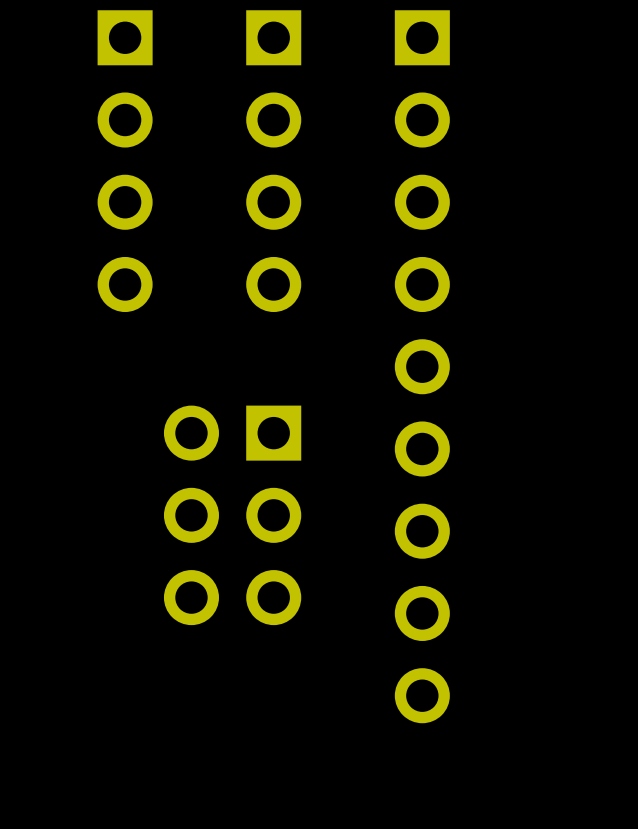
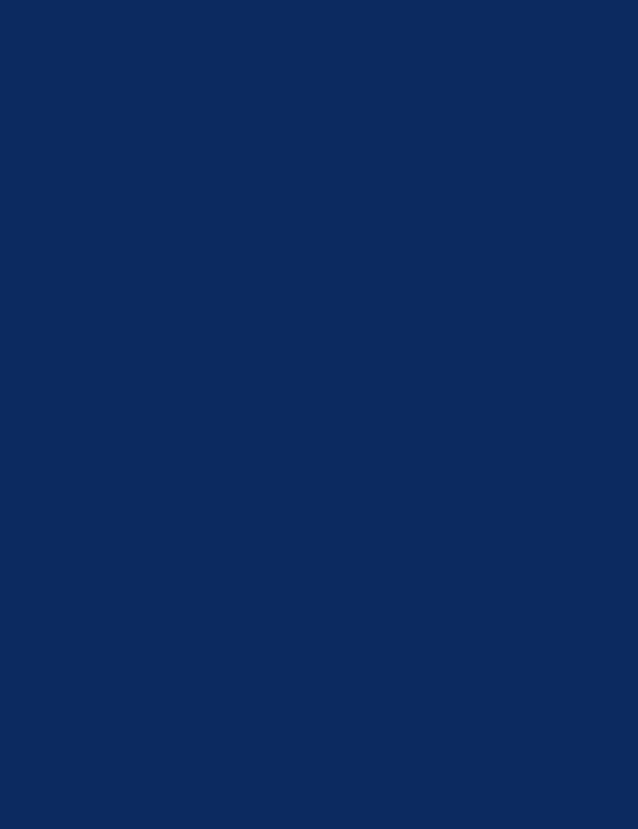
part: (125, 161) -> none
part: (273, 161) -> none
part: (422, 366) -> none
part: (232, 515) -> none

